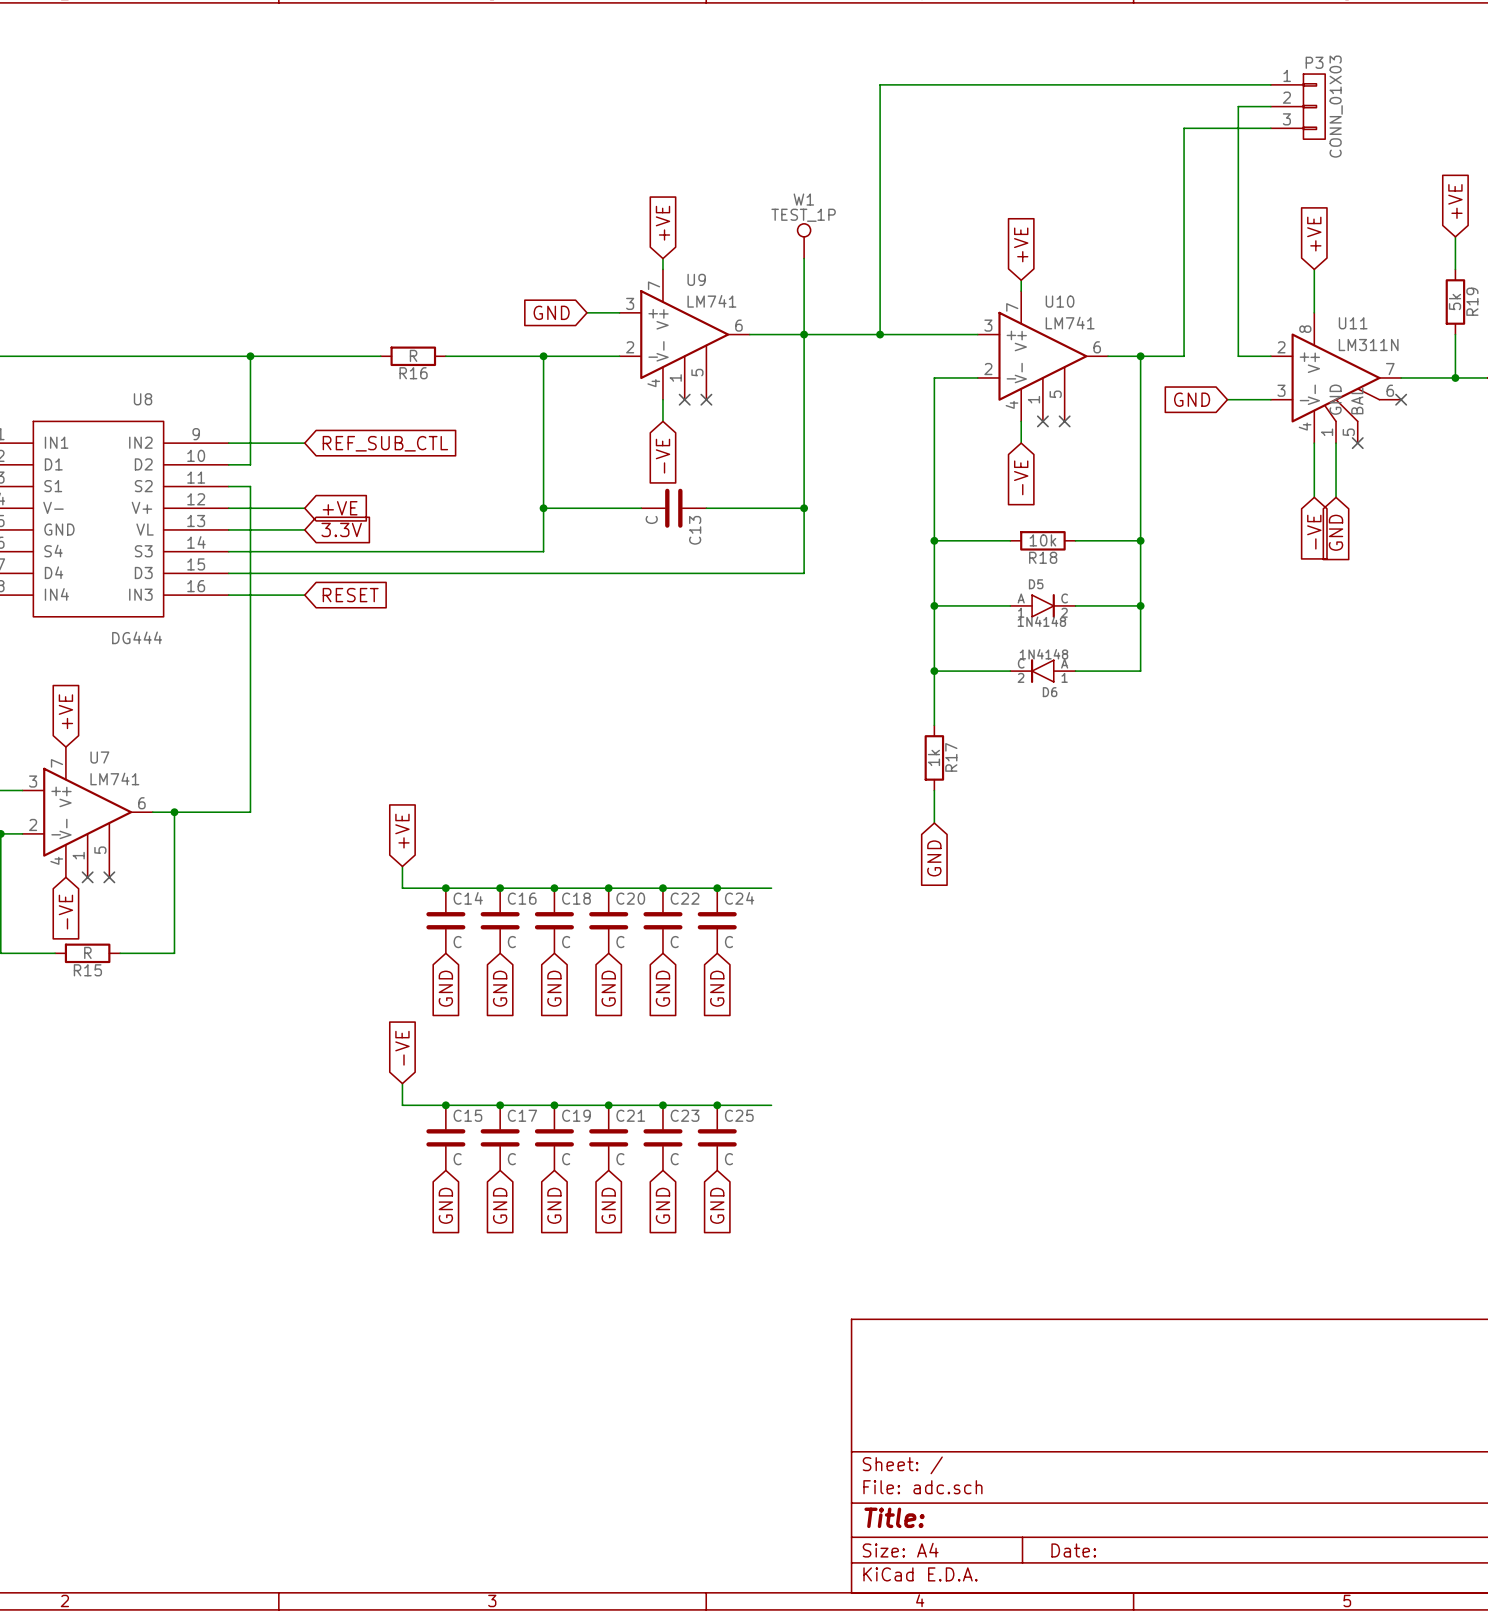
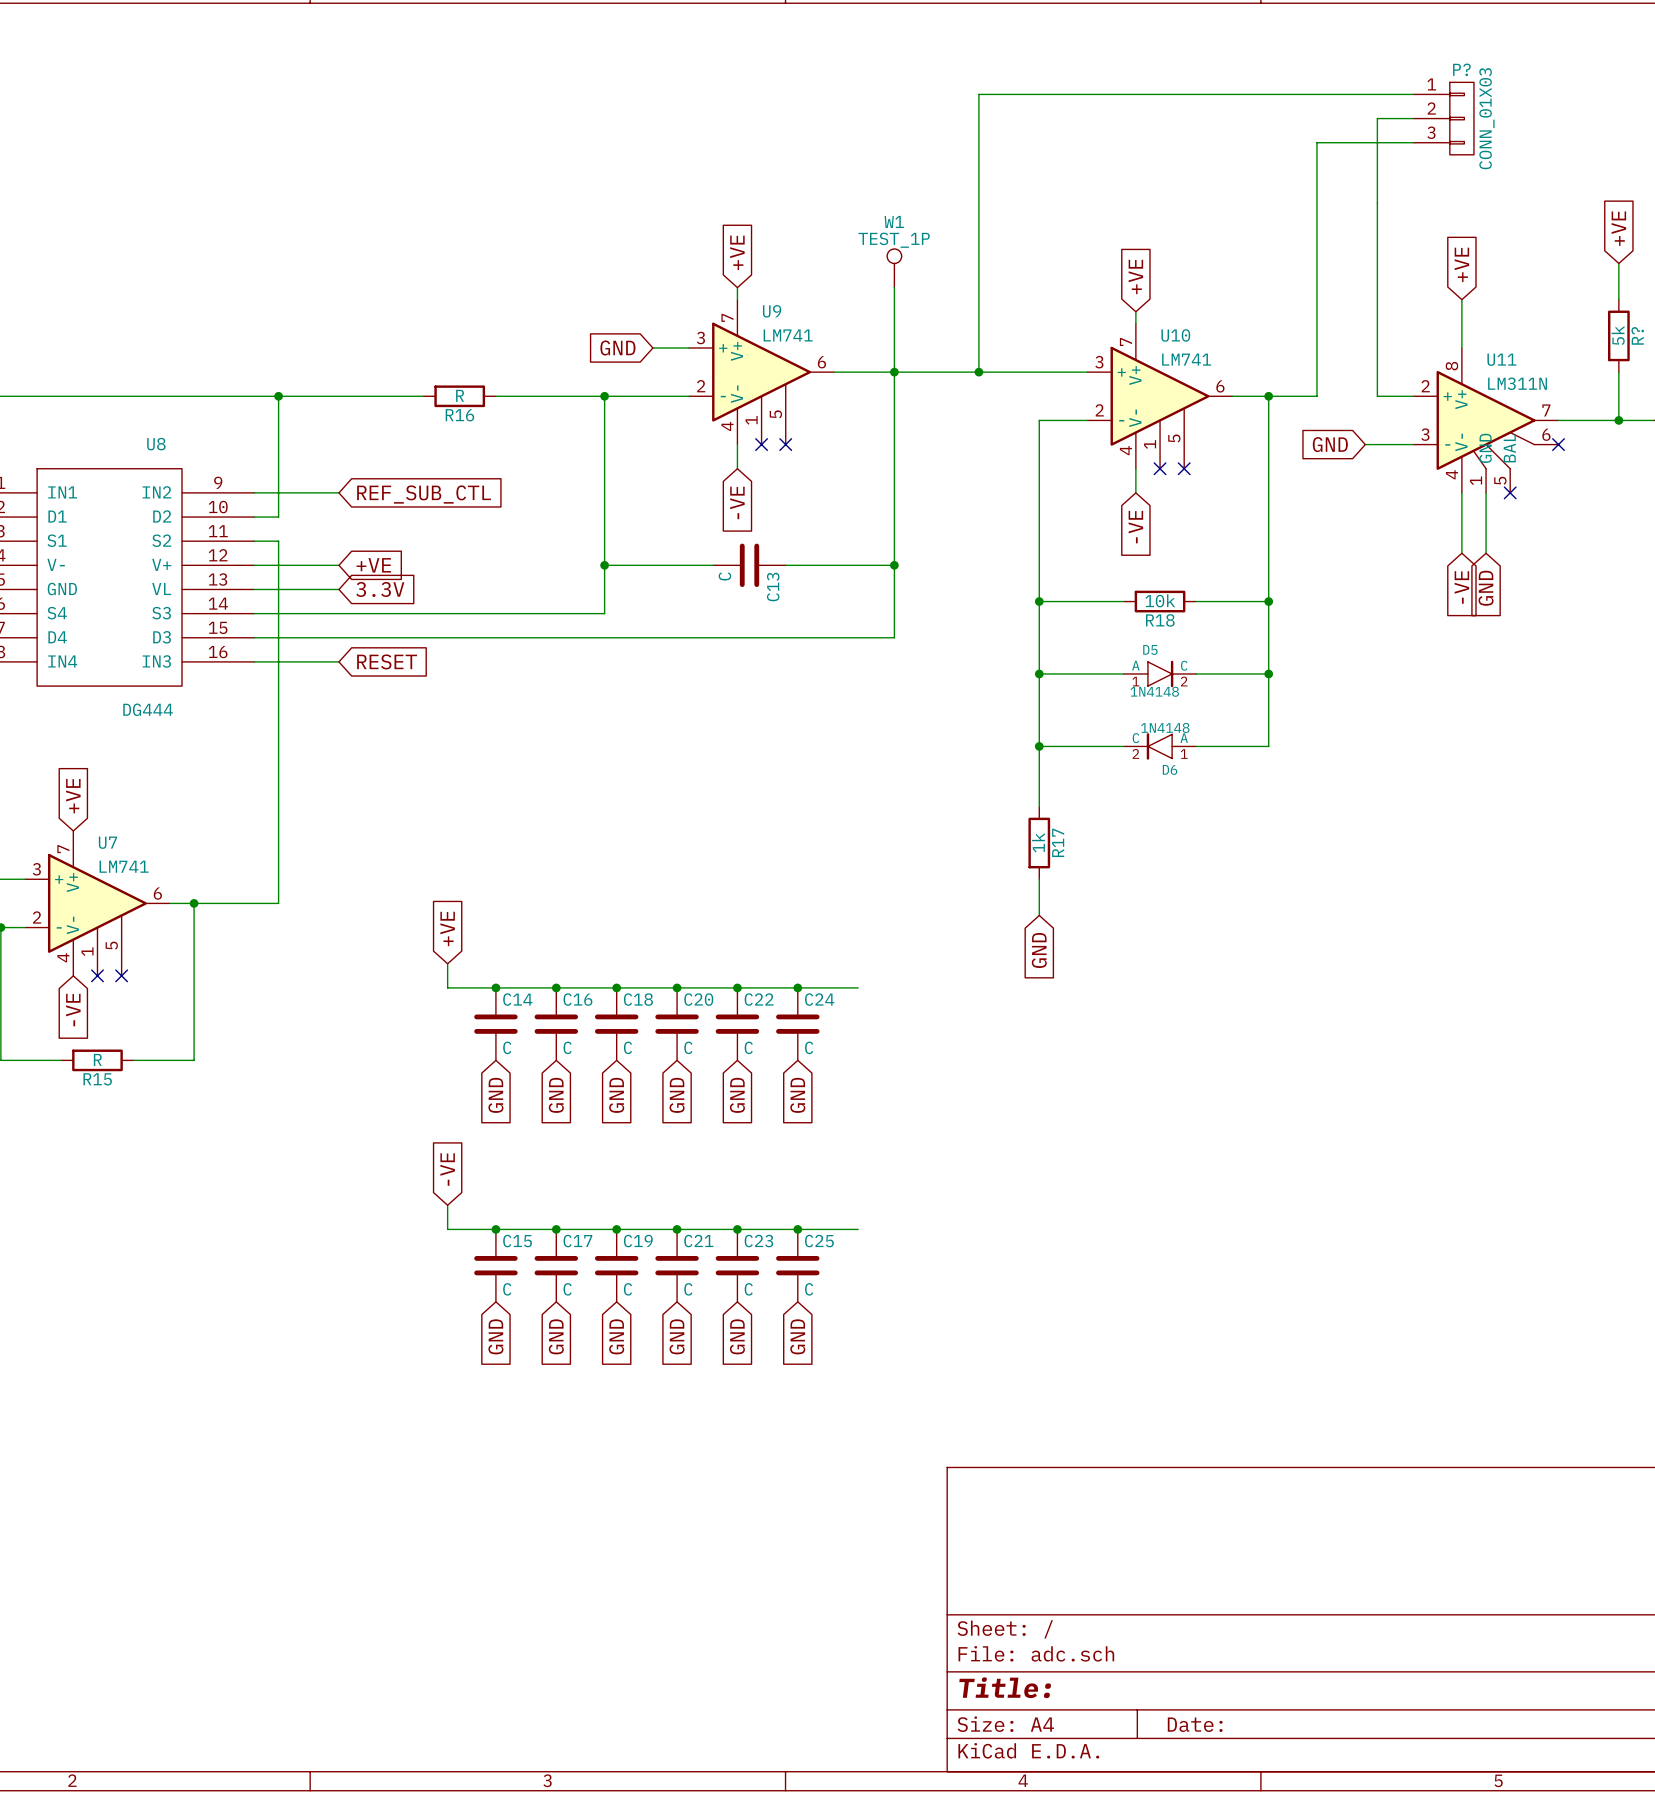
P3 name: P3 (1314, 62) -> P? (1461, 69)
R19 name: R19 (1472, 301) -> R? (1637, 335)

